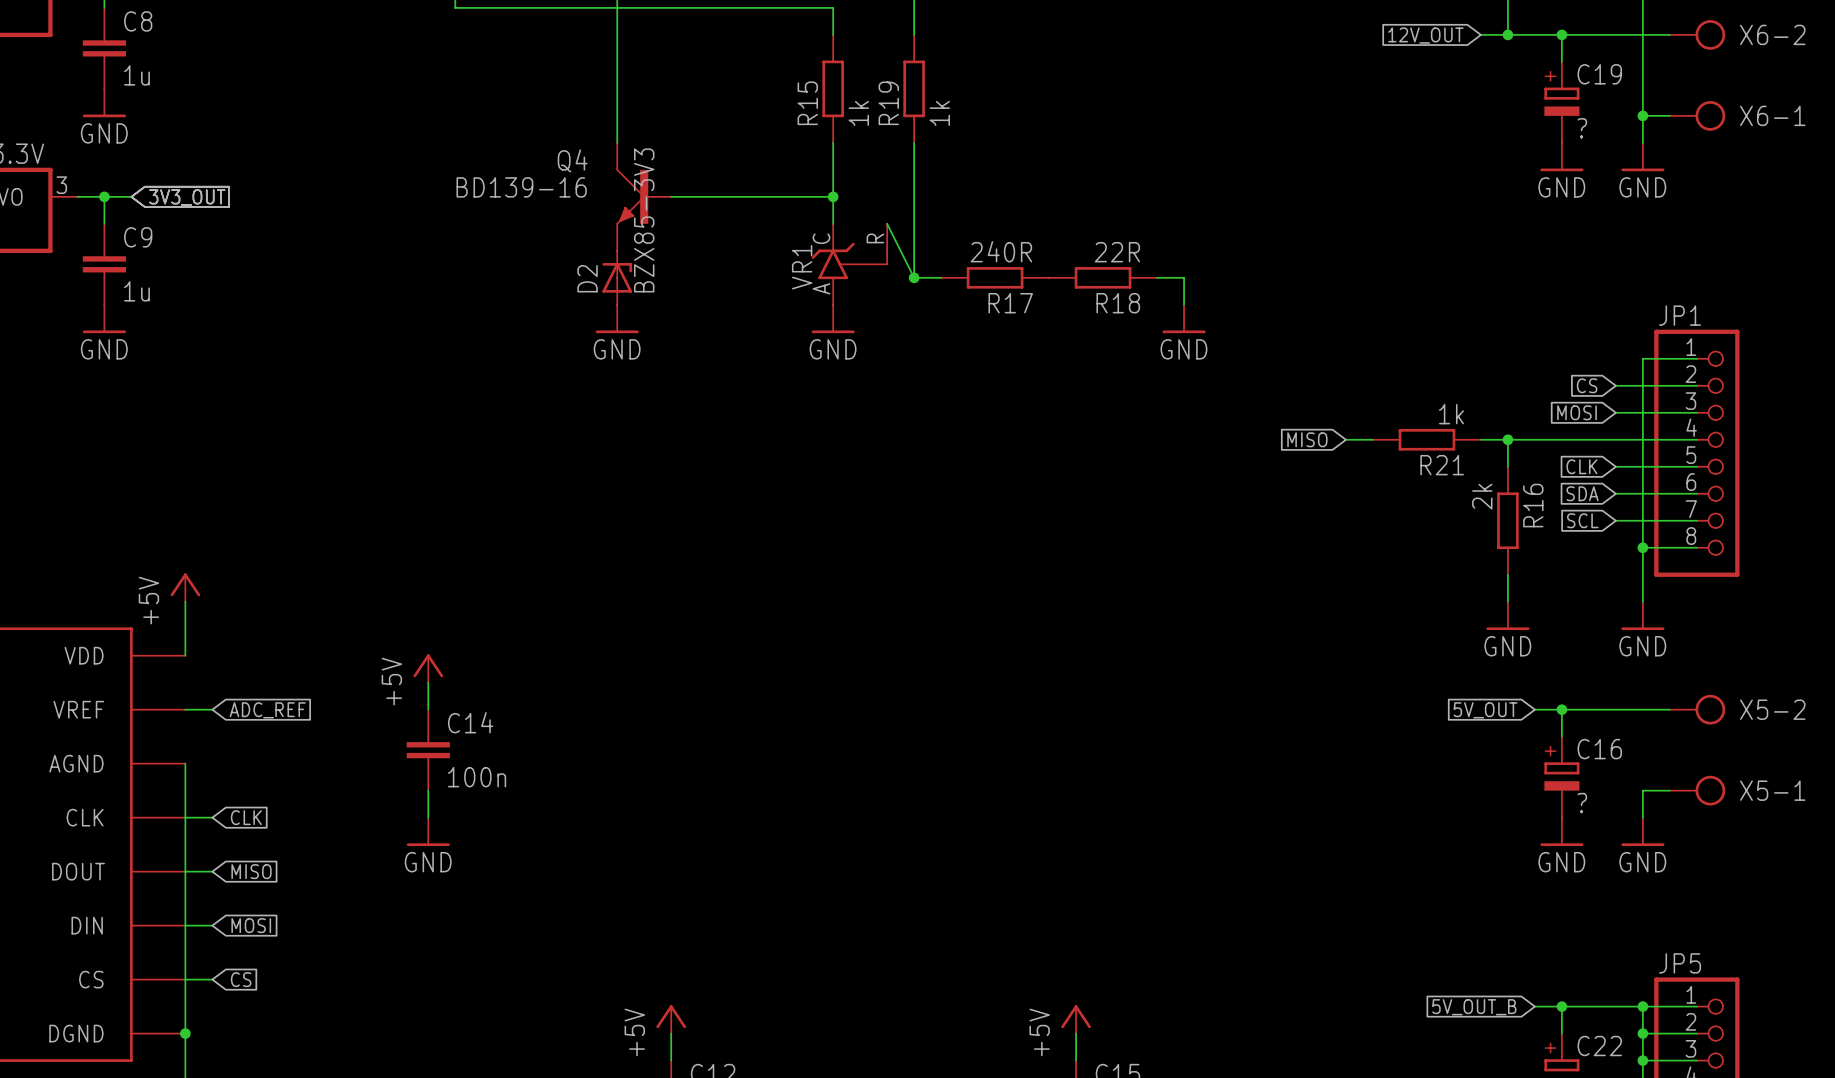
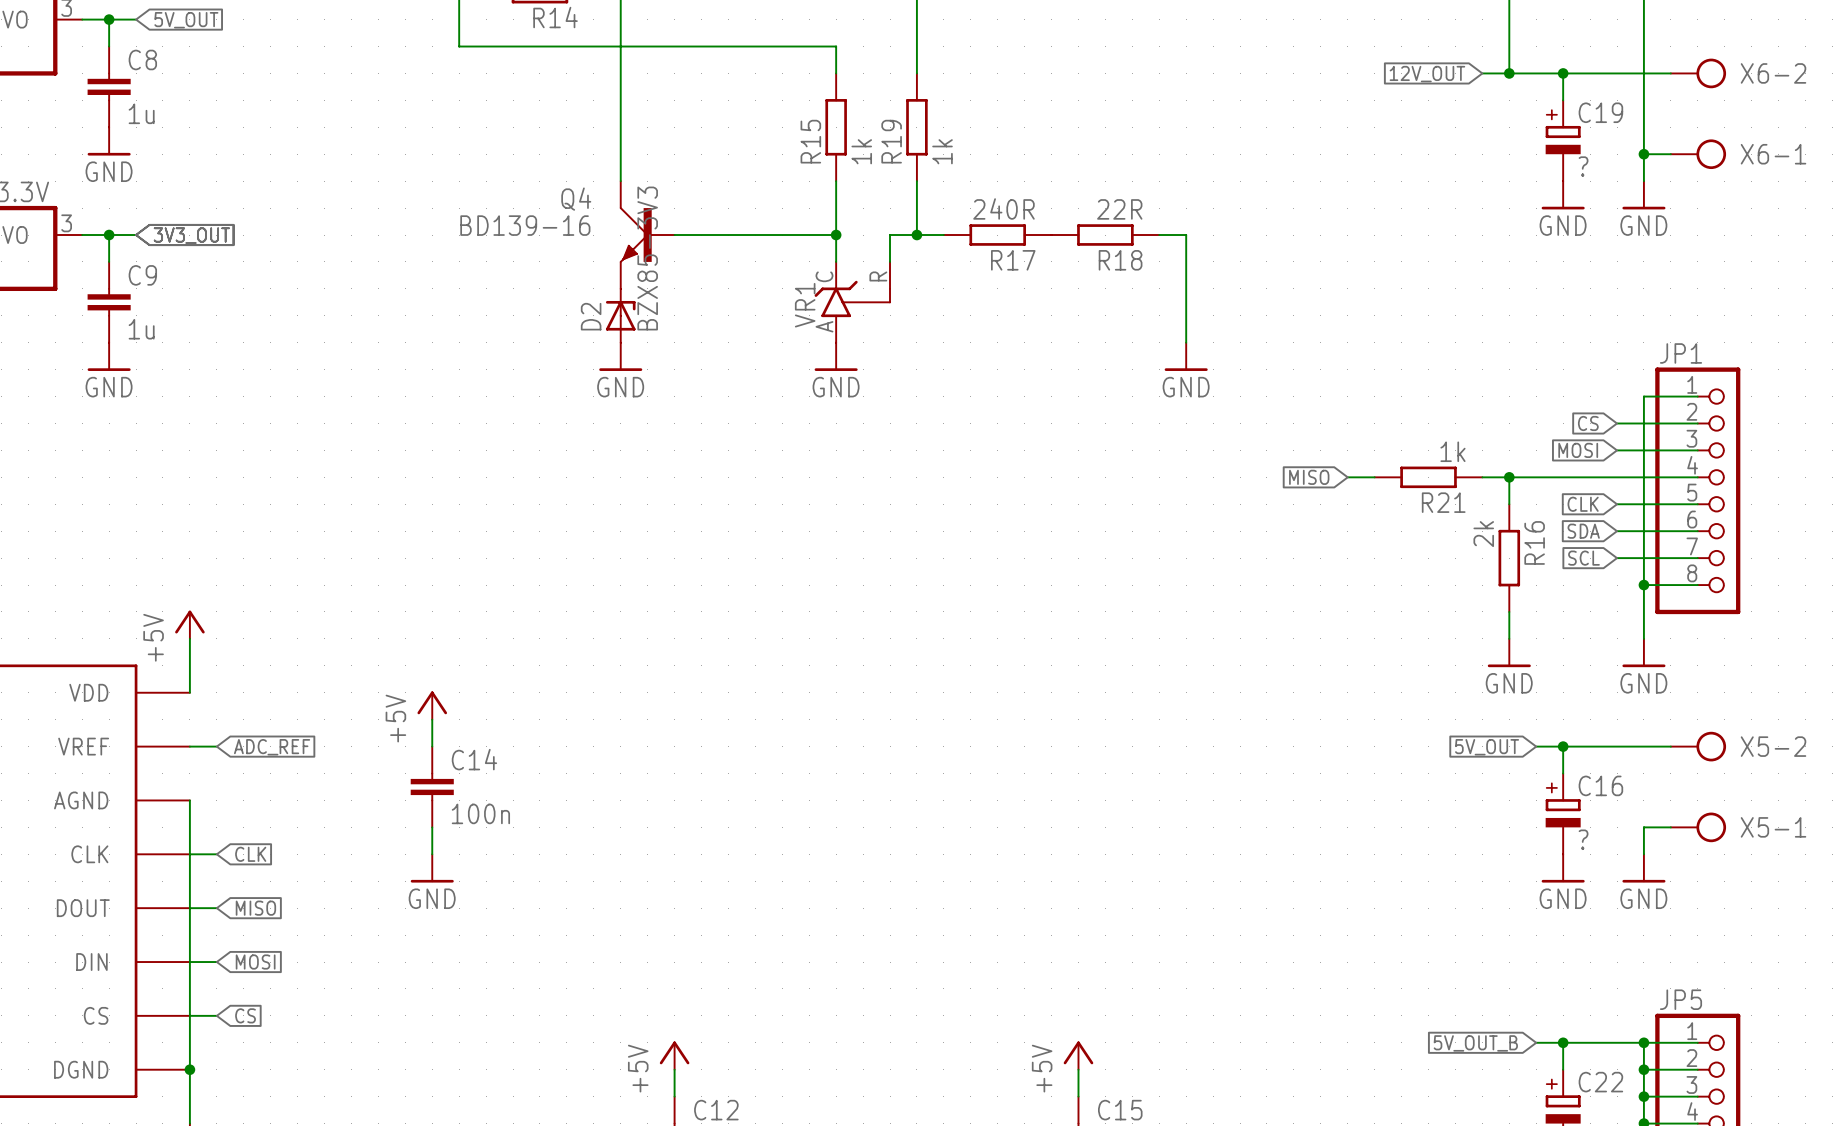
wire: (914, 196) (914, 277) -> none
junction: none -> (916, 235)
wire: (887, 223) (914, 277) -> (890, 261) (890, 235) (943, 235)
wire: (914, 277) (941, 277) -> none
junction: (914, 277) -> none
R17 position: (995, 277) -> (997, 235)
R18 position: (1103, 277) -> (1105, 235)
wire: (1157, 277) (1184, 277) -> (1159, 235) (1186, 235) (1186, 315)

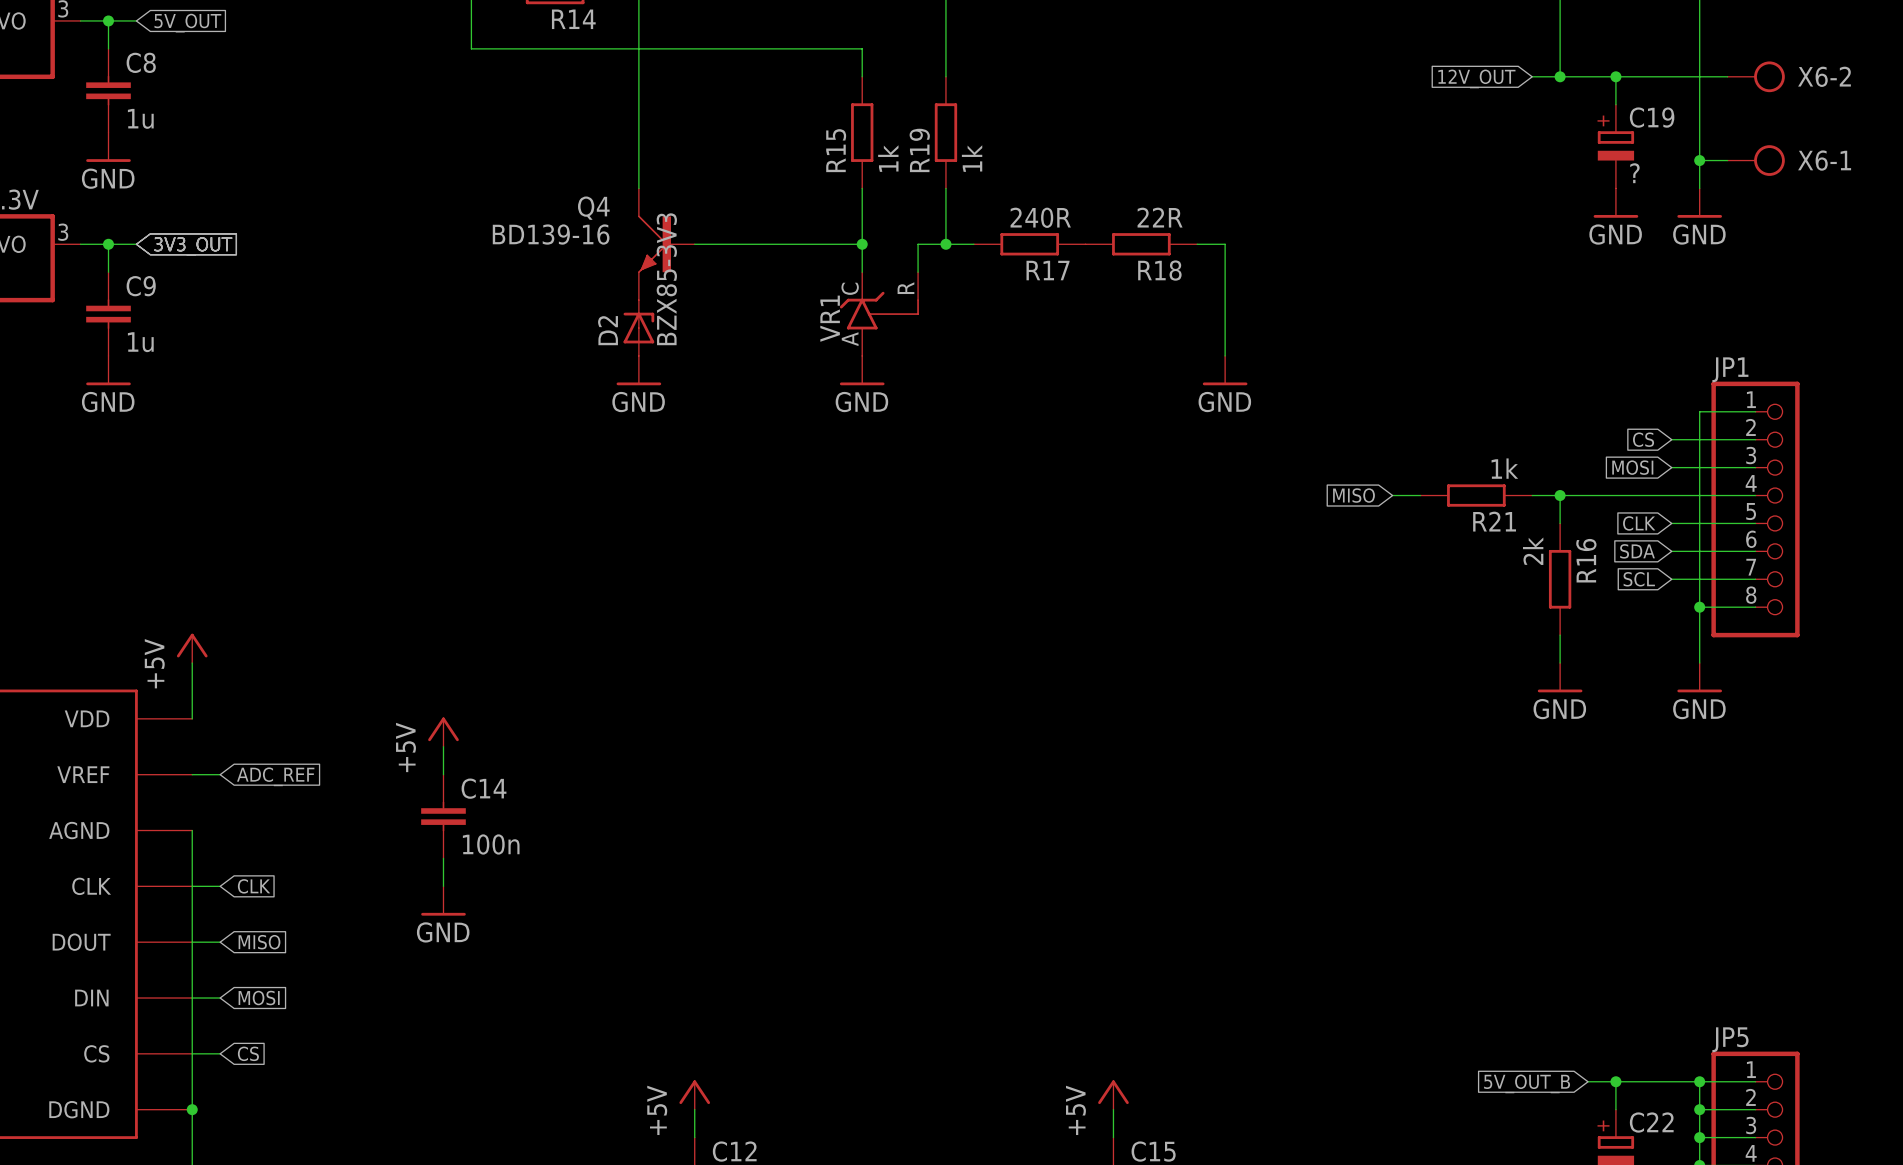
wire: (1536, 746) (1670, 746) -> none
wire: (1563, 746) (1563, 773) -> none
junction: (1563, 746) -> none
X5-2: (1698, 746) -> none
global label: 5V_OUT (1487, 747) -> none
C16: ? (1563, 813) -> none
wire: (1670, 827) (1643, 827) (1643, 854) -> none
X5-1: (1698, 827) -> none
power symbol: GND (1563, 868) -> none
power symbol: GND (1643, 868) -> none

